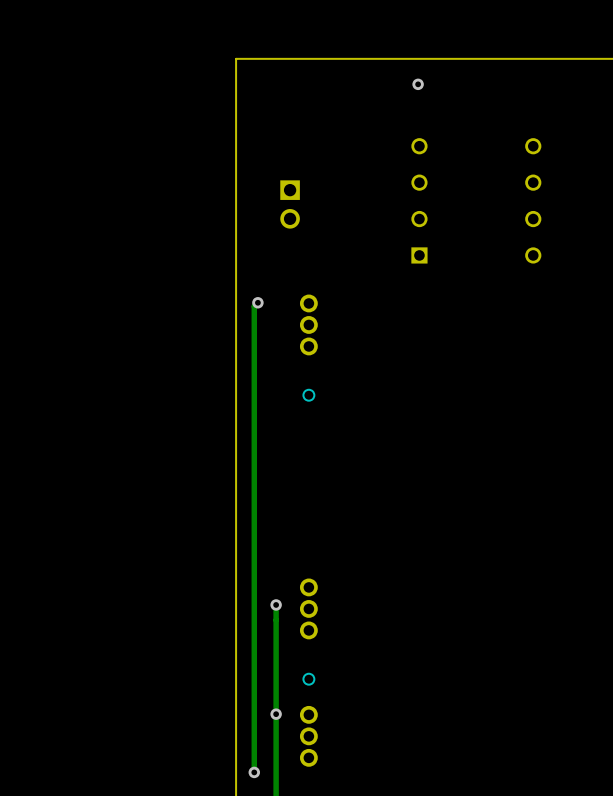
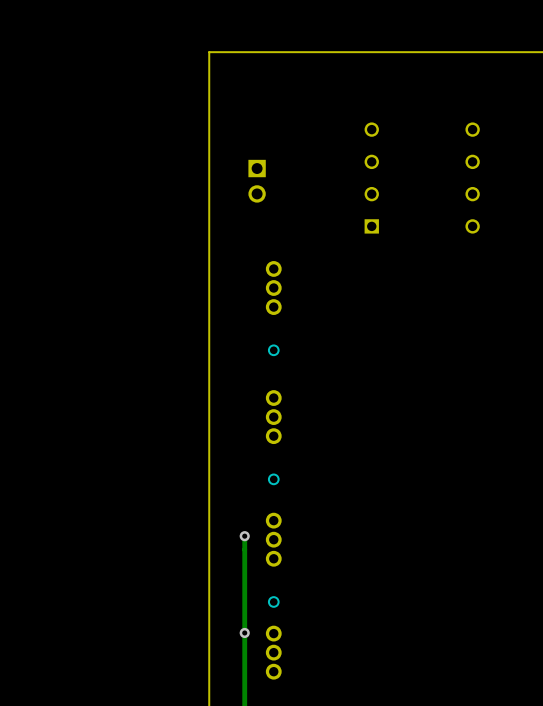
via: (418, 84) -> none
track: (257, 302) (254, 306) (254, 772) -> none
via: (257, 302) -> none
part: none -> (273, 437)
via: (254, 772) -> none

